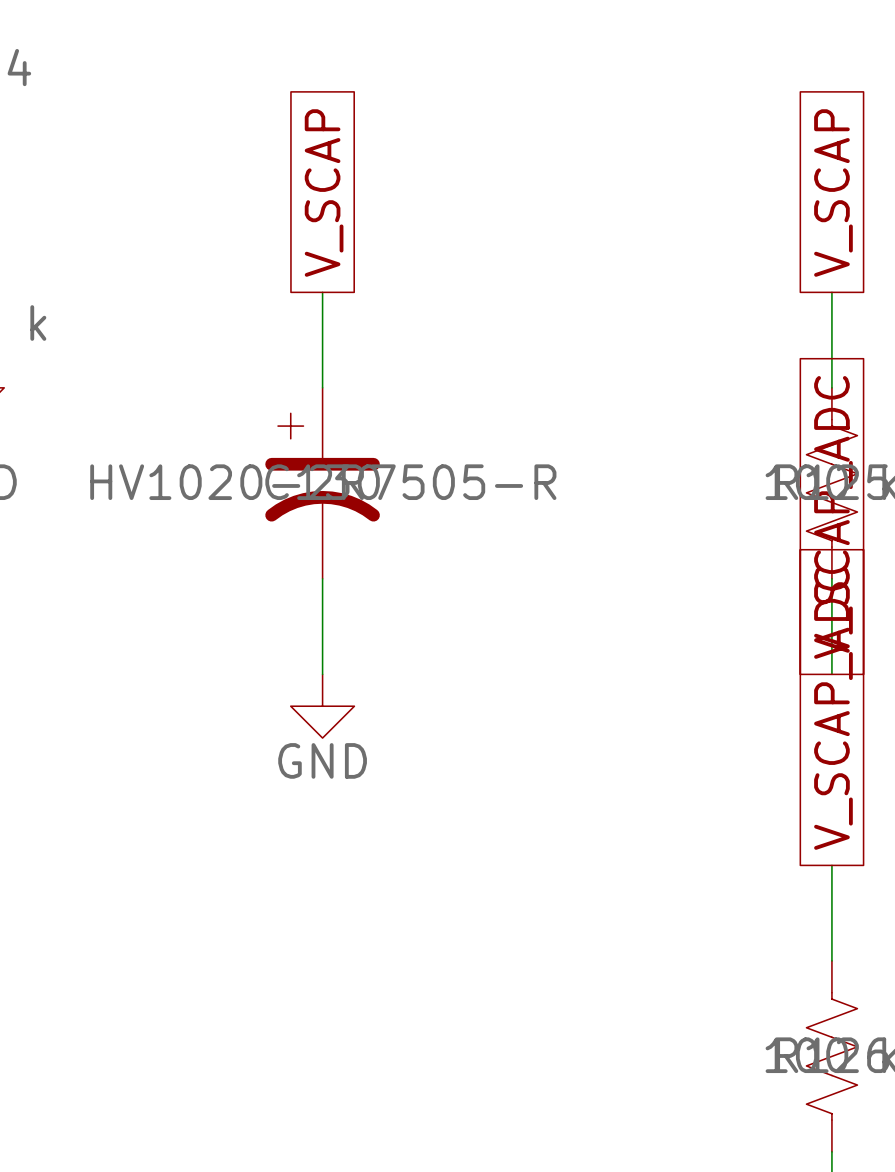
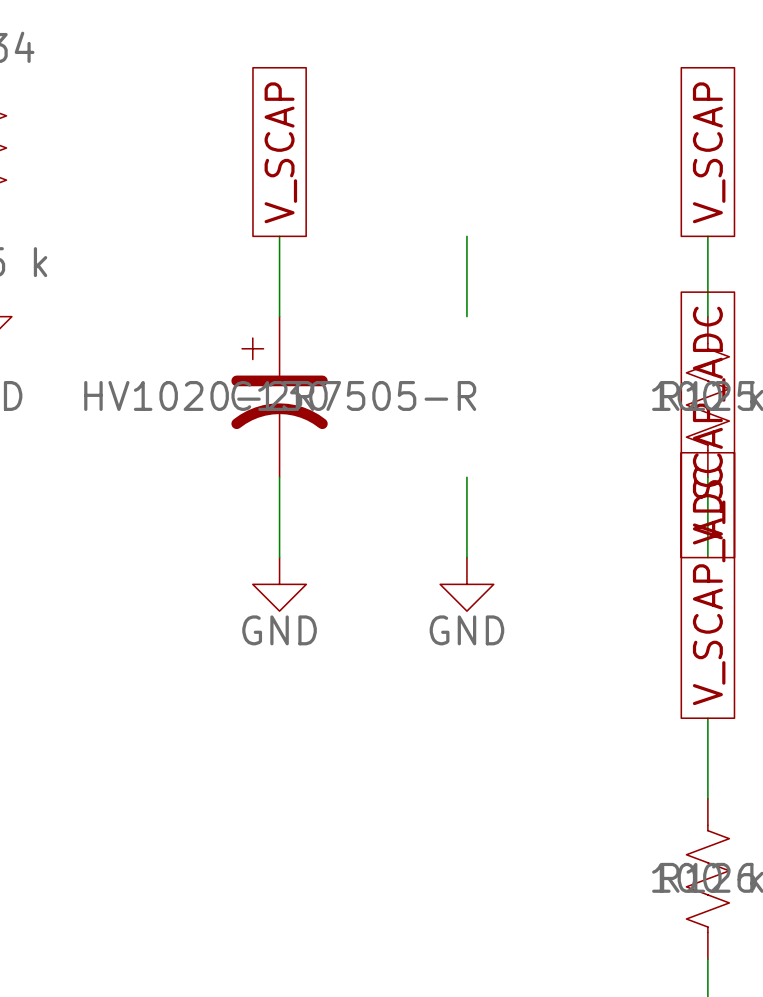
wire: none -> (466, 236) (466, 316)
wire: none -> (466, 477) (466, 557)
power symbol: none -> GND (466, 584)

